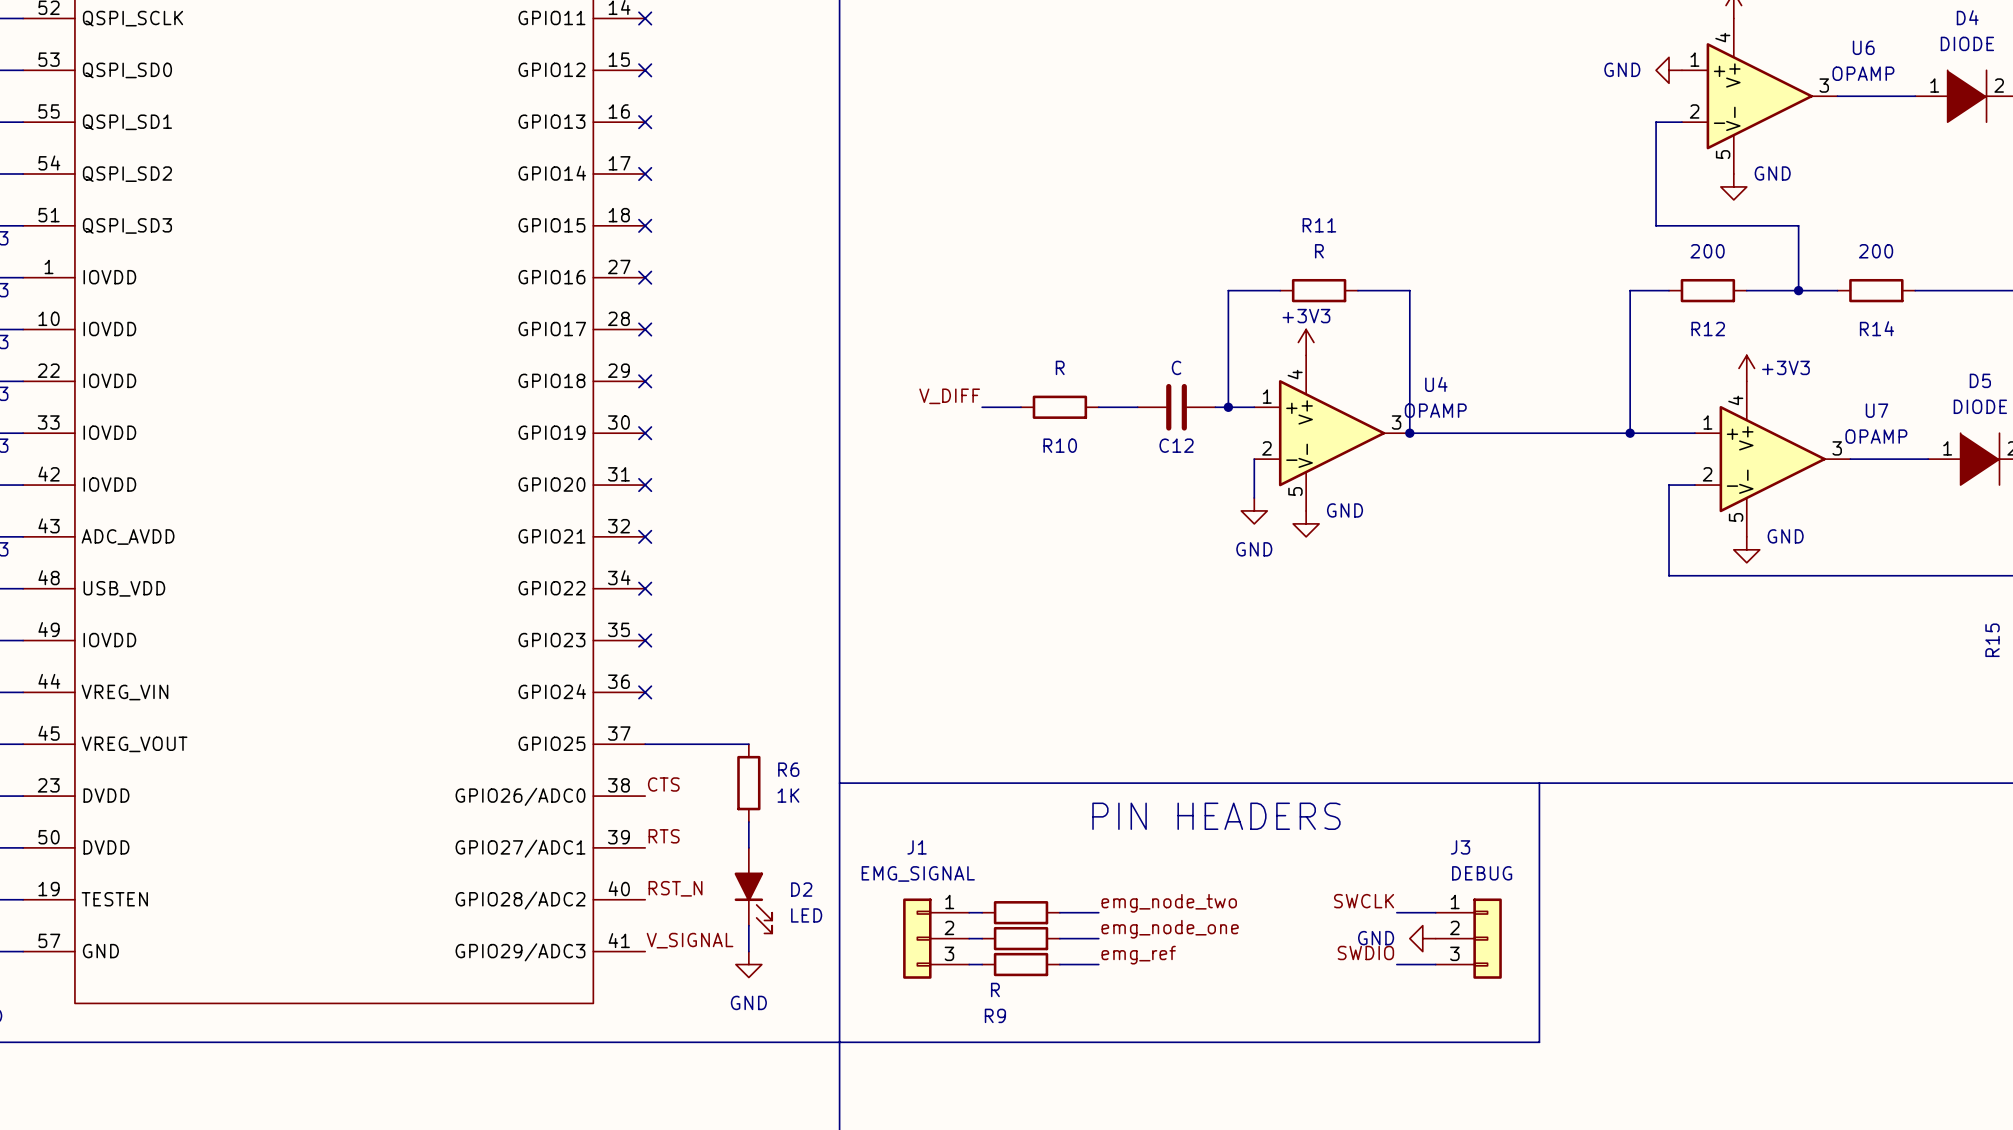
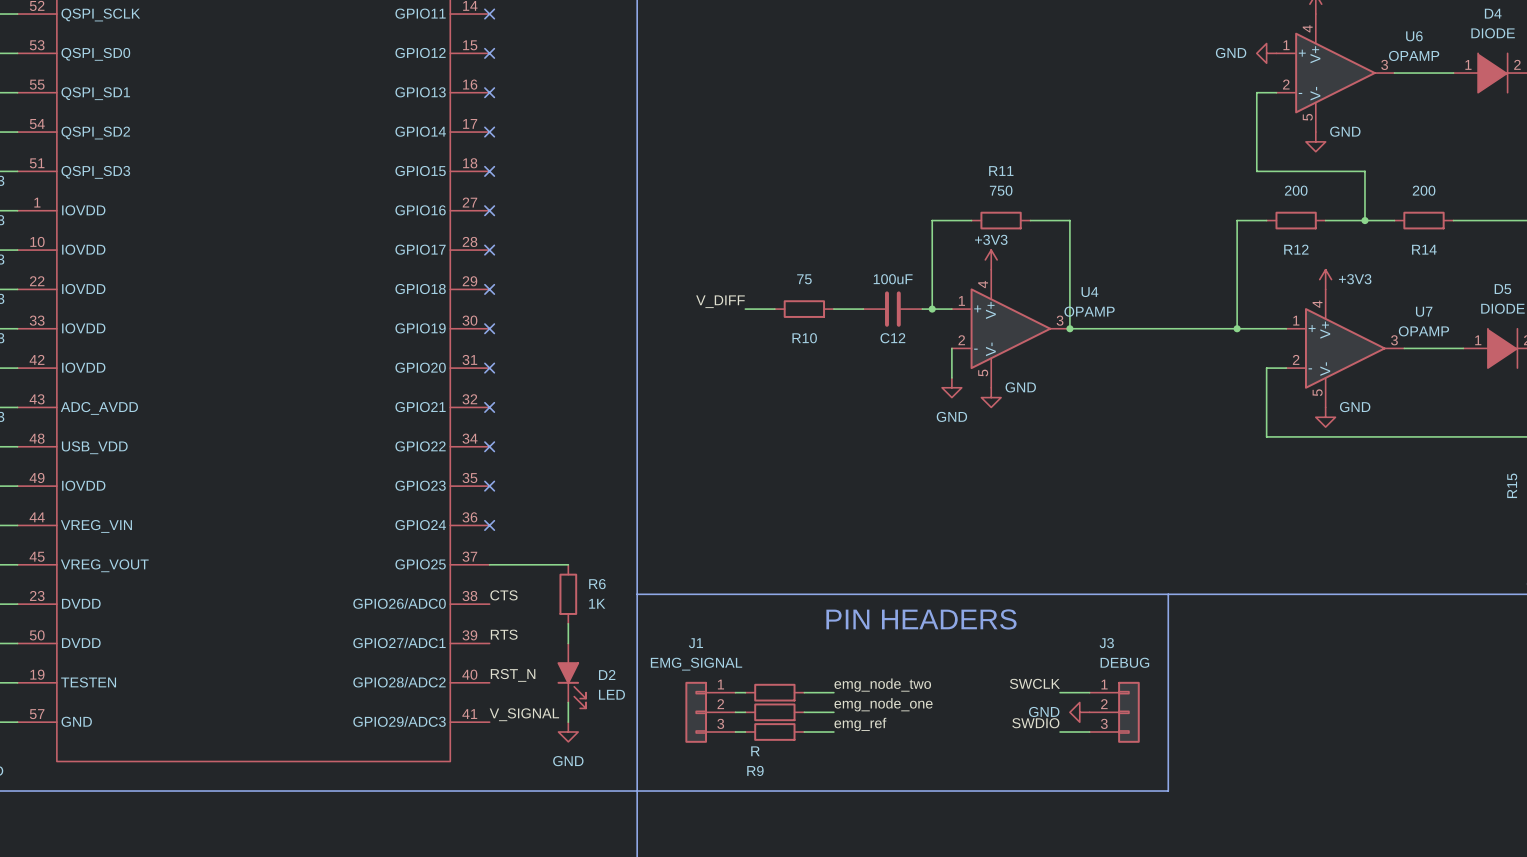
R11 value: R (1319, 251) -> 750 (1001, 190)
R10 value: R (1060, 367) -> 75 (804, 279)
C12 value: C (1176, 367) -> 100uF (893, 279)

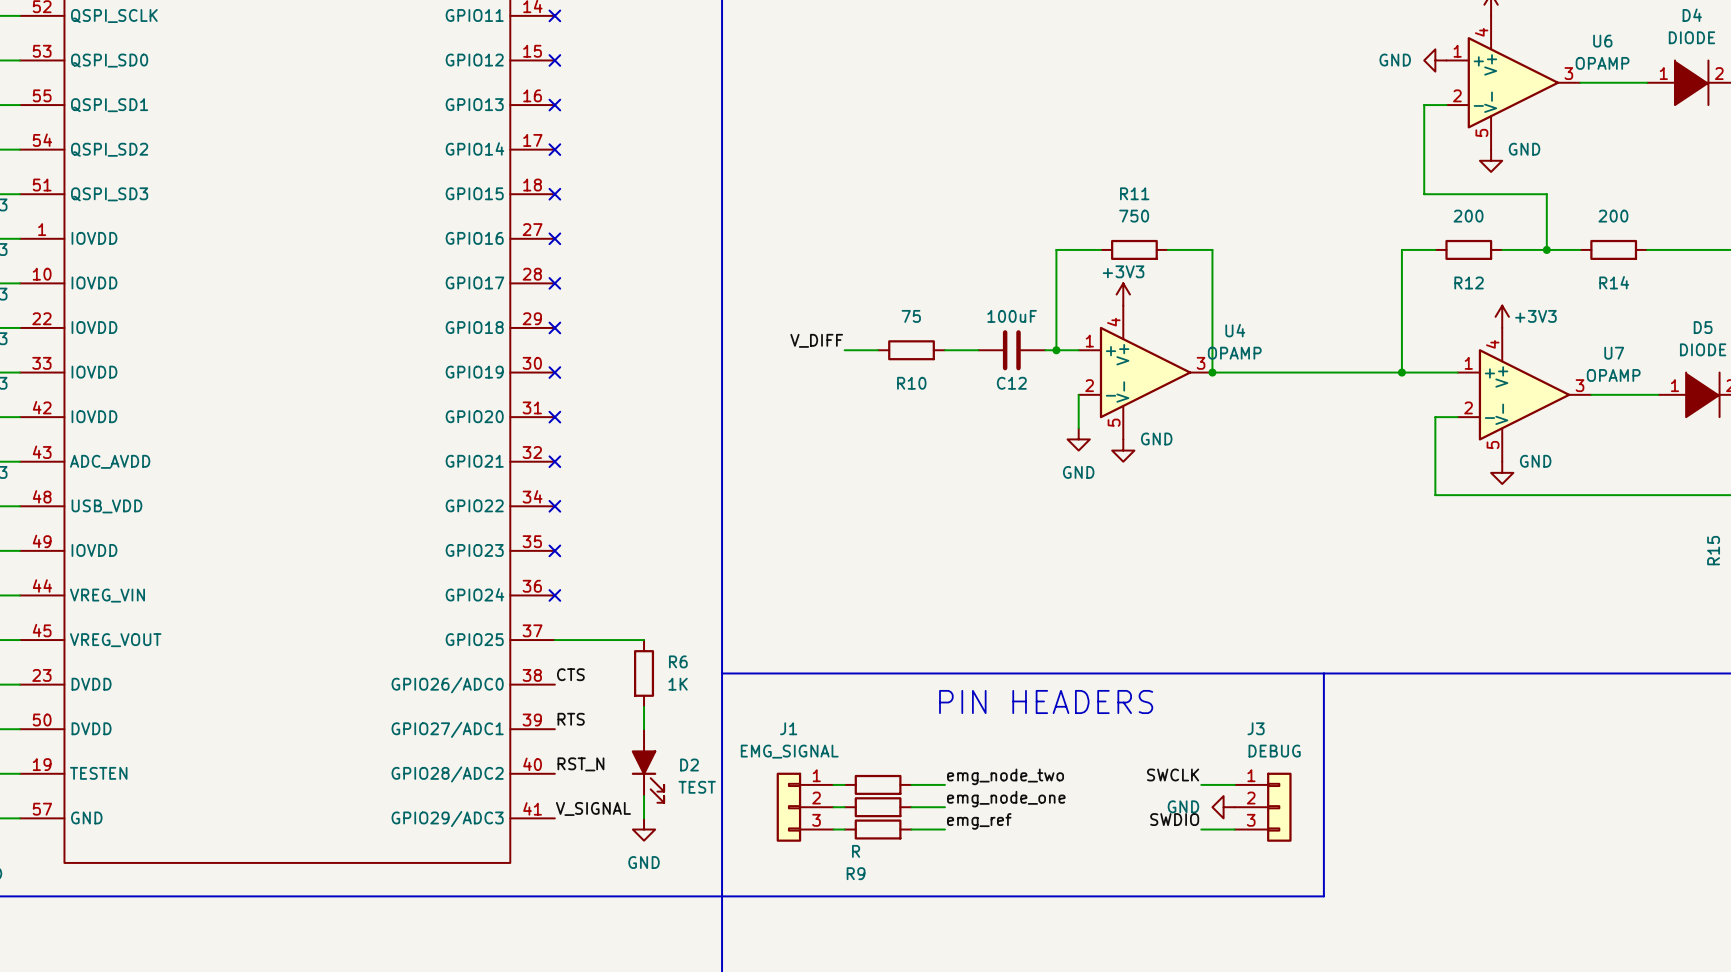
D2 value: LED (611, 694) -> TEST (697, 787)

